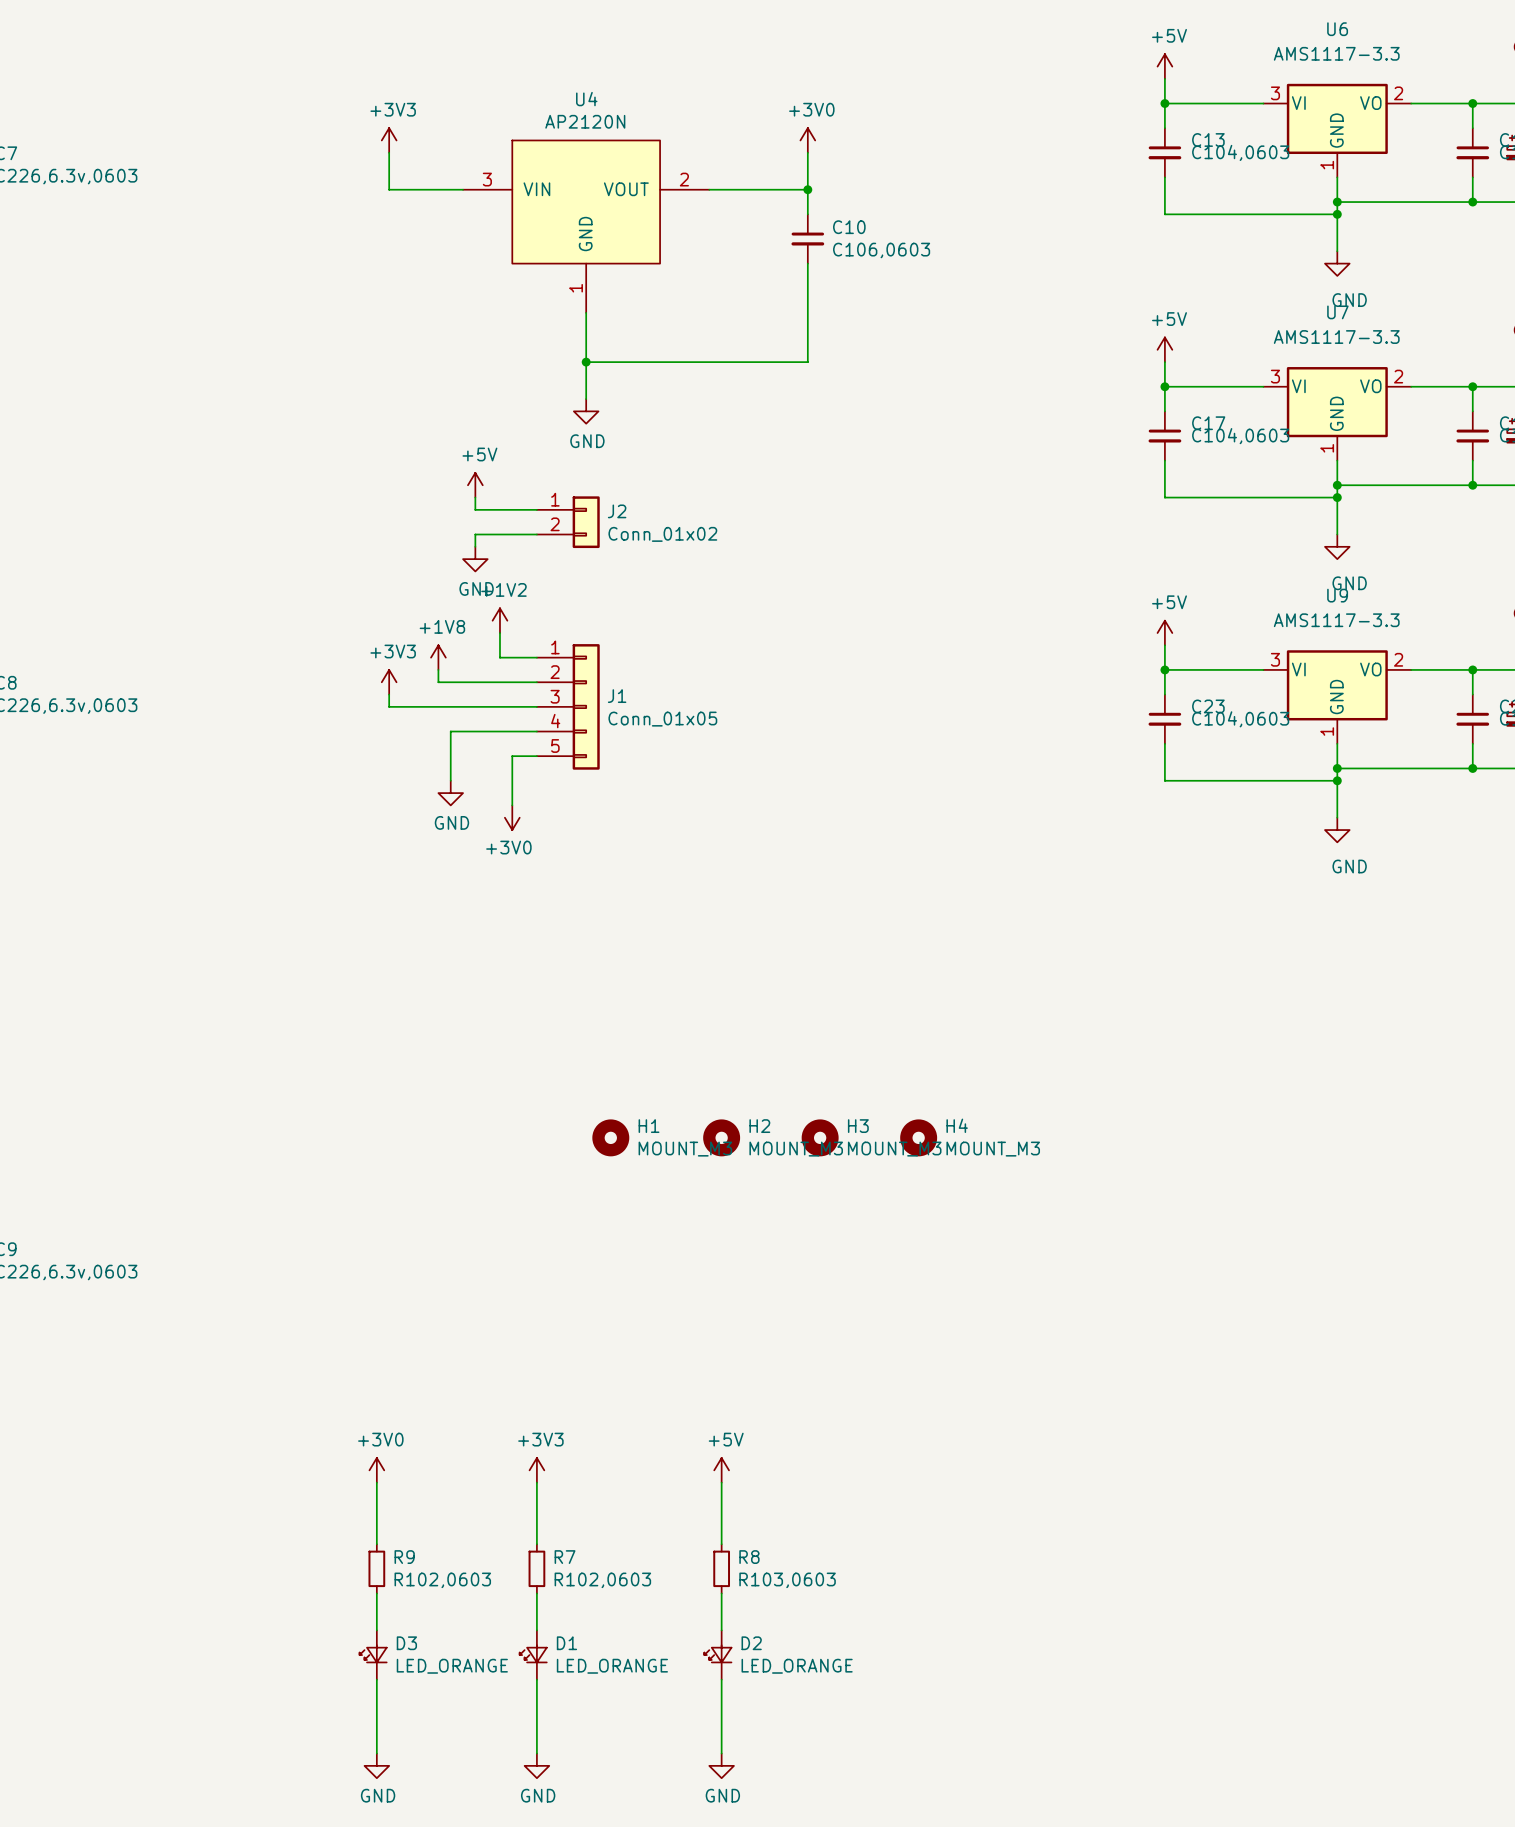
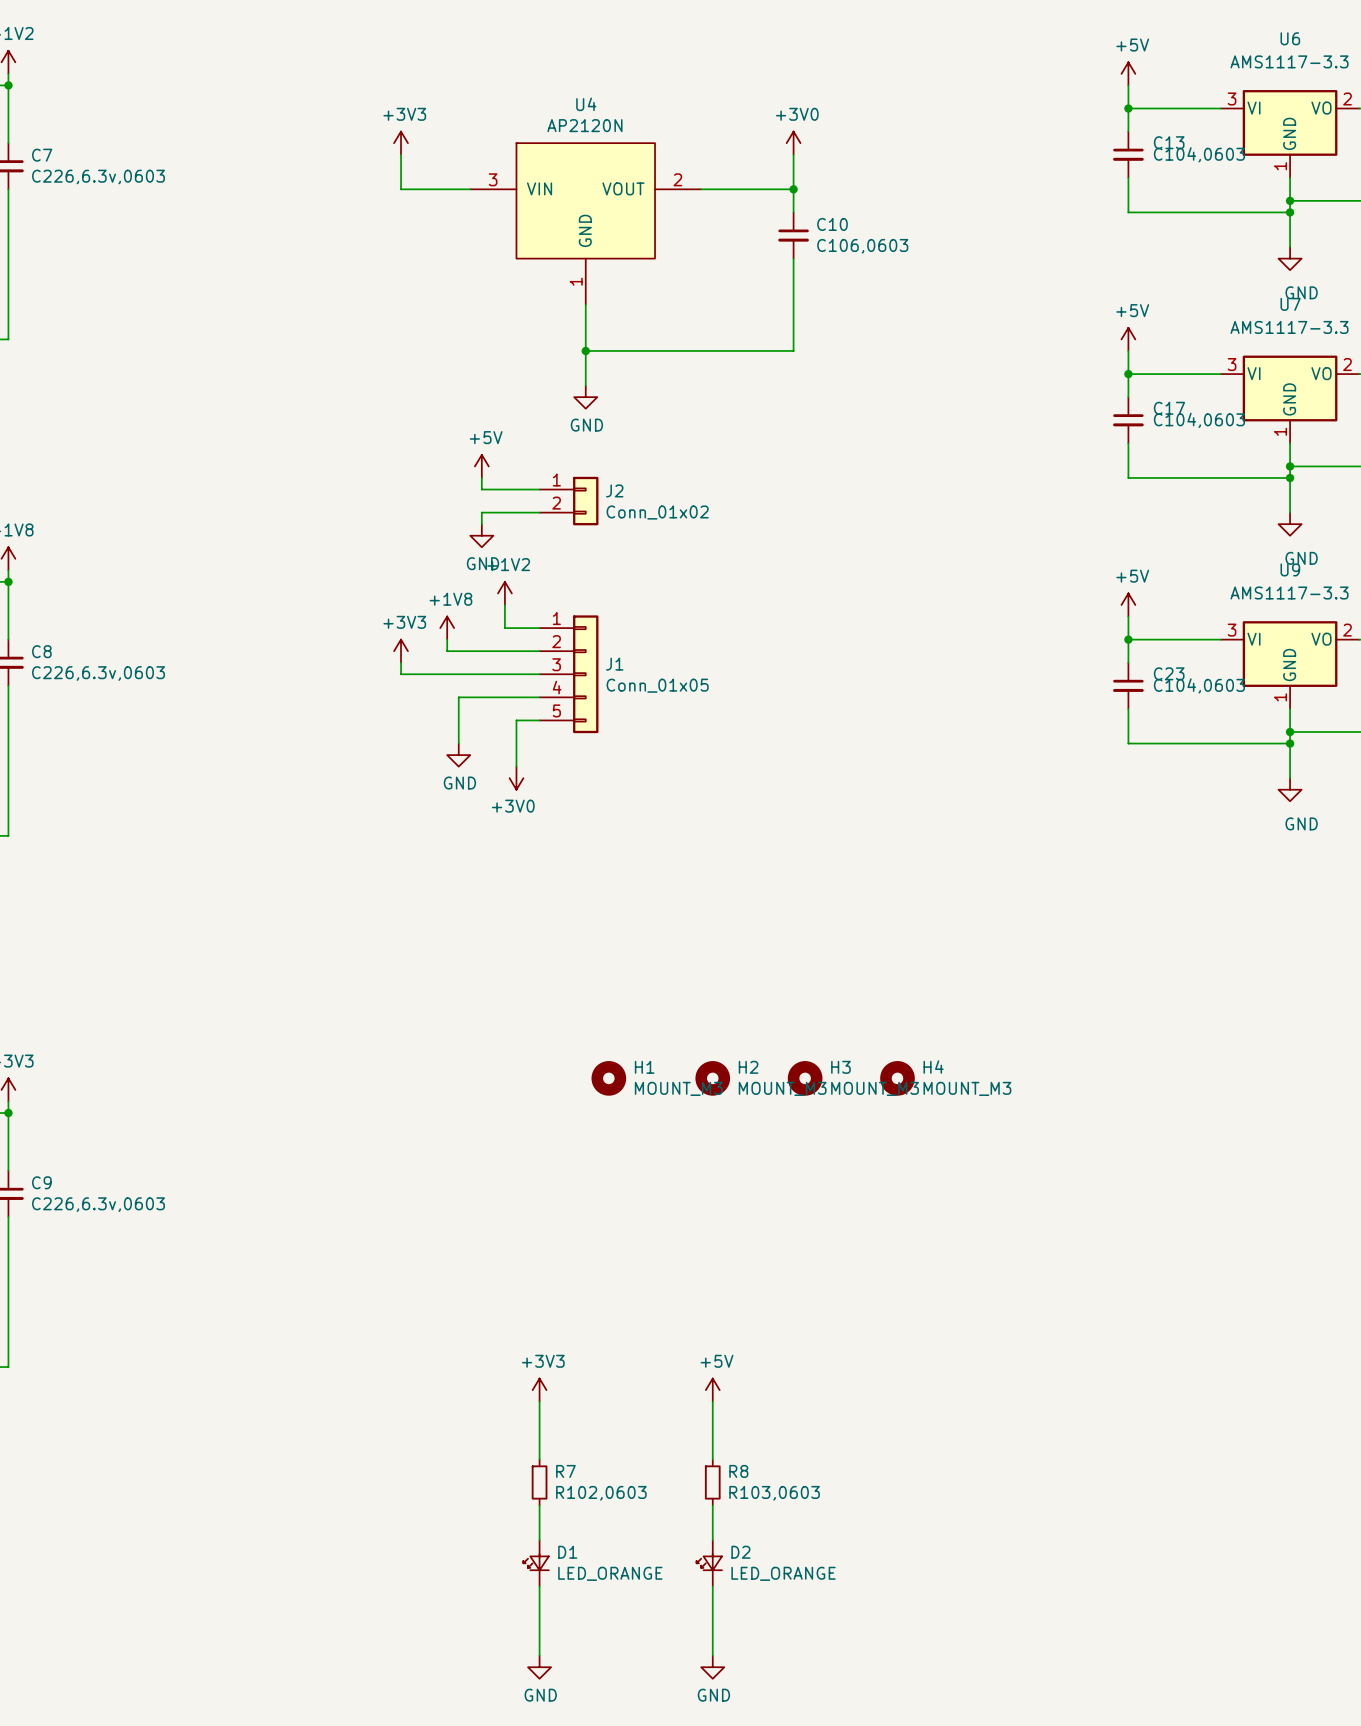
power symbol: +3V0 (376, 1470) -> none
wire: (376, 1482) (376, 1544) -> none
R9: R102,0603 (376, 1568) -> none
wire: (376, 1593) (376, 1630) -> none
D3: LED_ORANGE (373, 1655) -> none
wire: (376, 1679) (376, 1753) -> none
power symbol: GND (376, 1765) -> none

